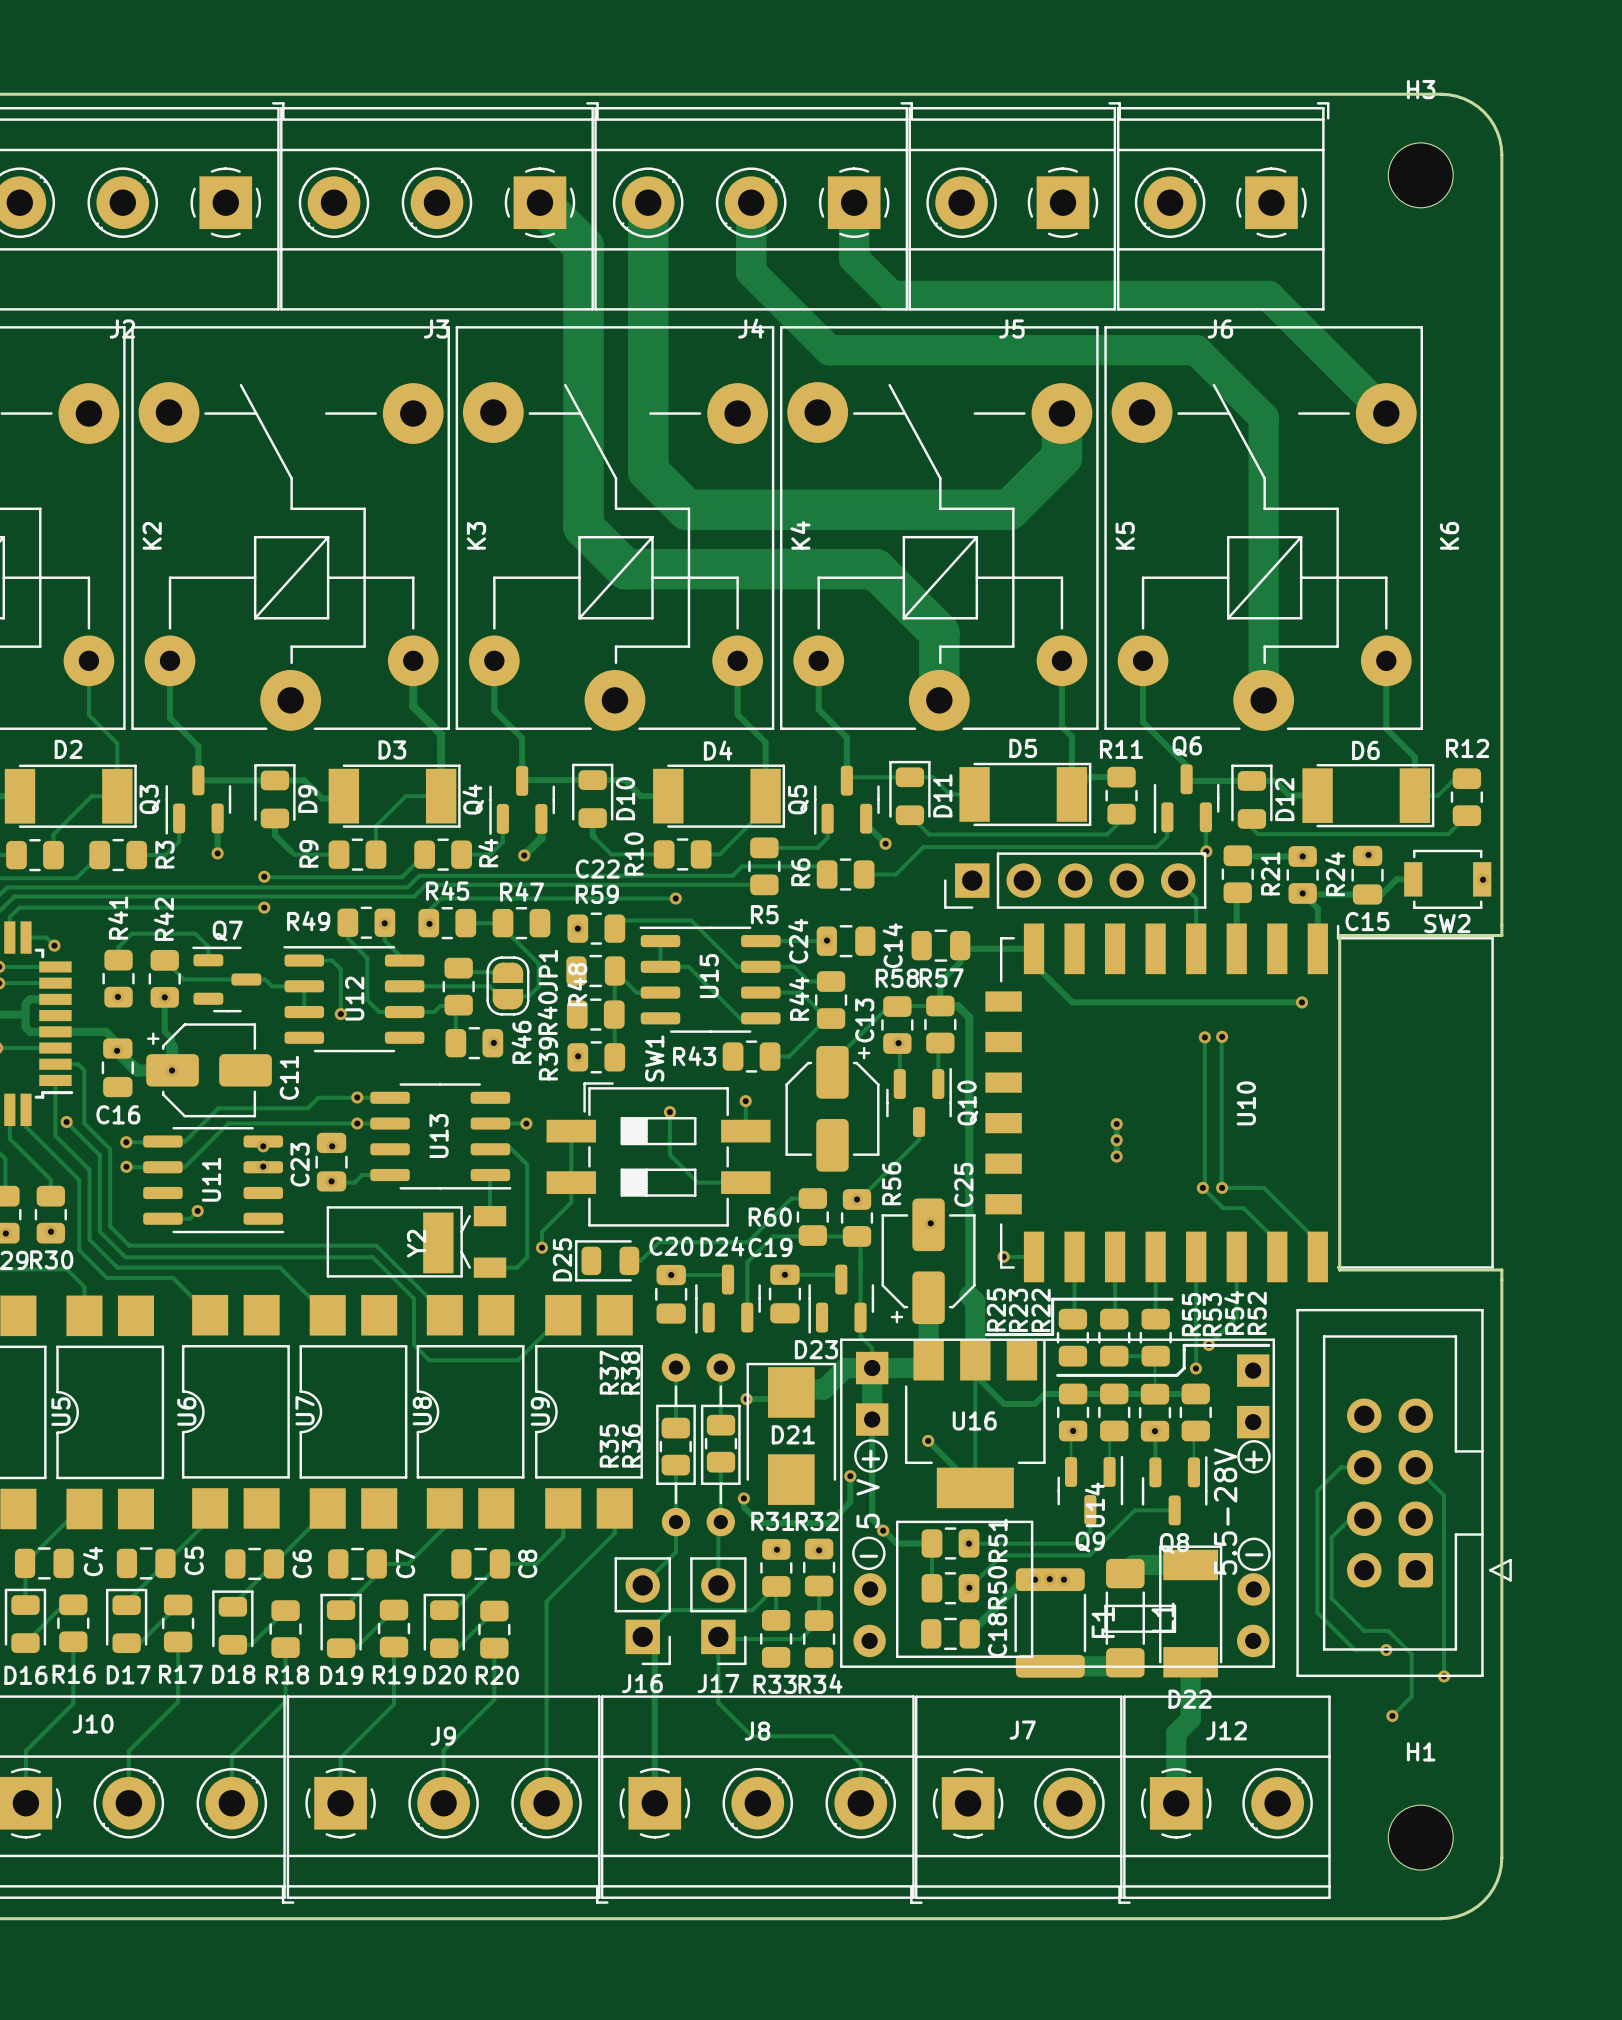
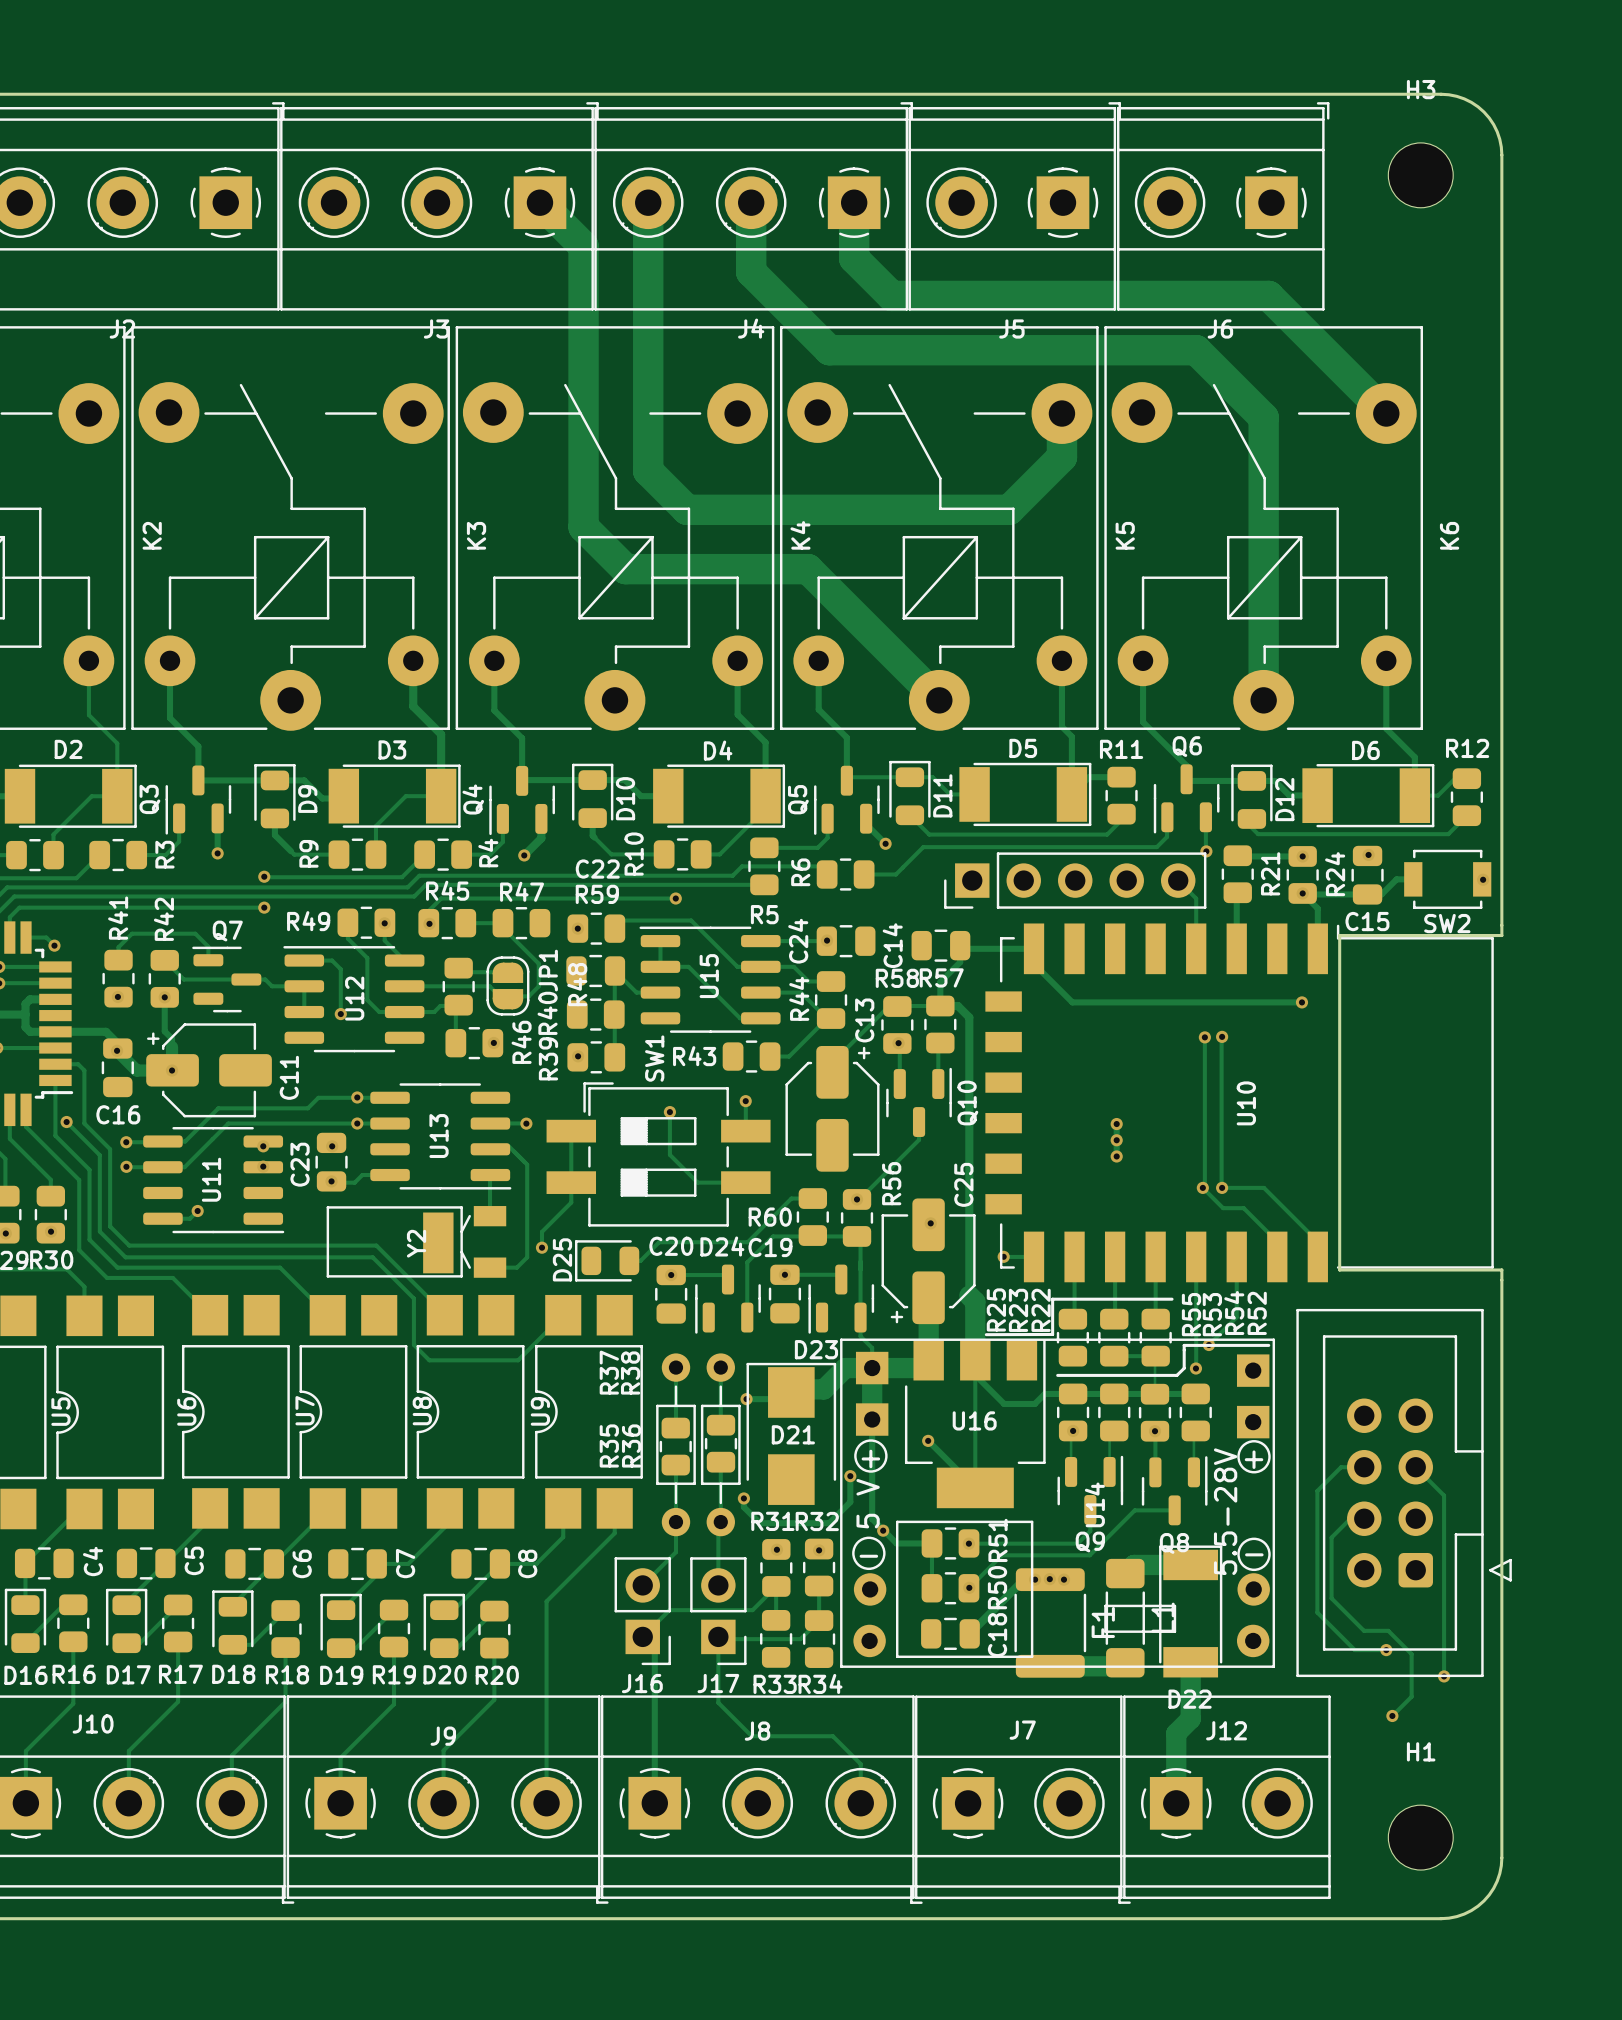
track width: thick (539, 202) (583, 246) (583, 527) (625, 569) (808, 569) -> thin (539, 202) (583, 246) (583, 527) (625, 569) (808, 569)
track width: thick (648, 202) (648, 471) (686, 509) (1009, 509) (1061, 457) (1061, 413) -> thin (648, 202) (648, 471) (686, 509) (1009, 509) (1061, 457) (1061, 413)
track: (808, 569) (875, 569) (939, 632) (939, 700) -> (808, 569) (939, 700)

